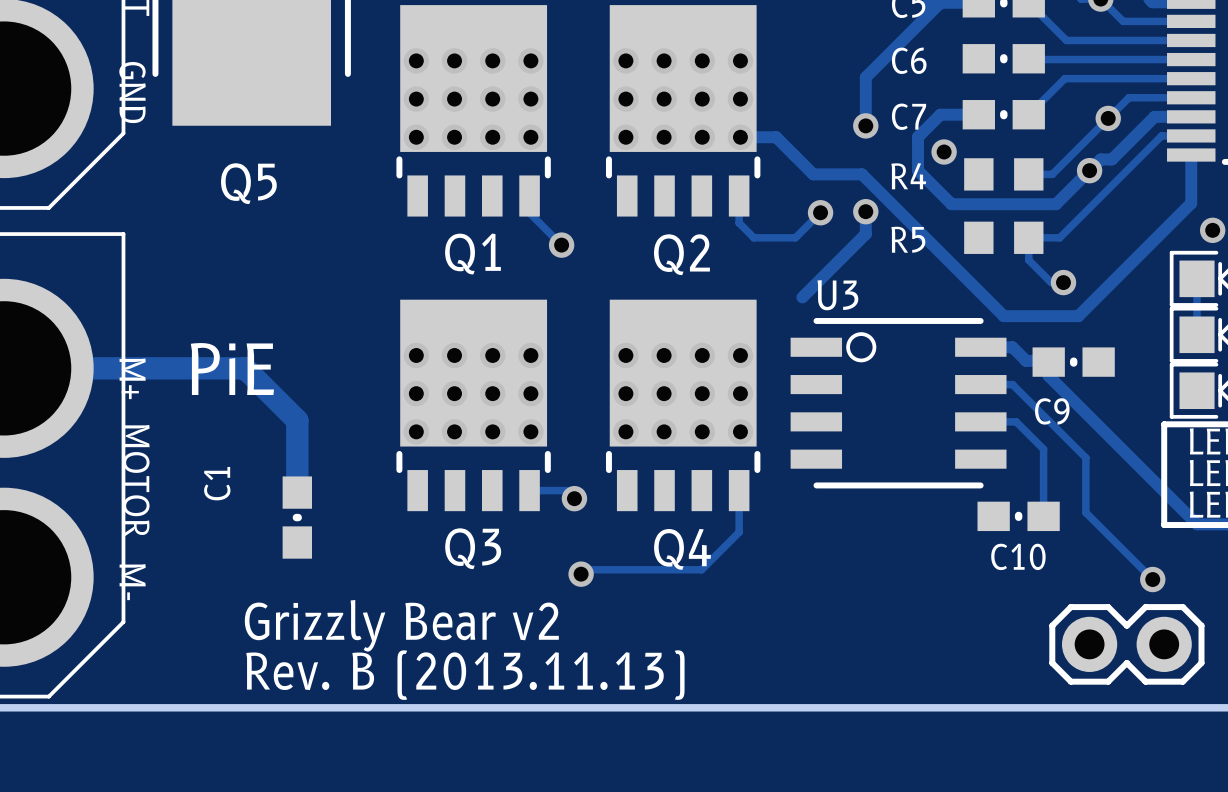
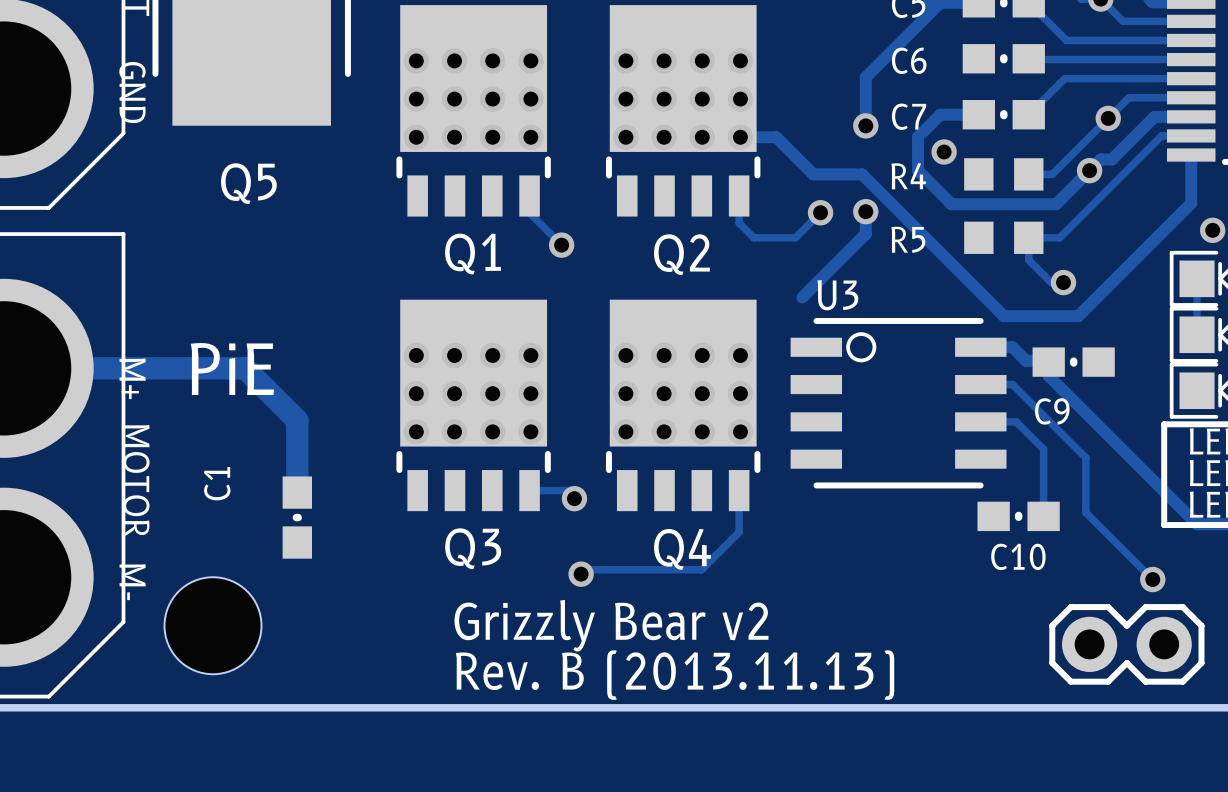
part: none -> (213, 625)
text position: Grizzly Bear v2 (401, 625) -> Grizzly Bear v2 (611, 625)
text position: Rev. B (2013.11.13) (465, 675) -> Rev. B (2013.11.13) (675, 675)

